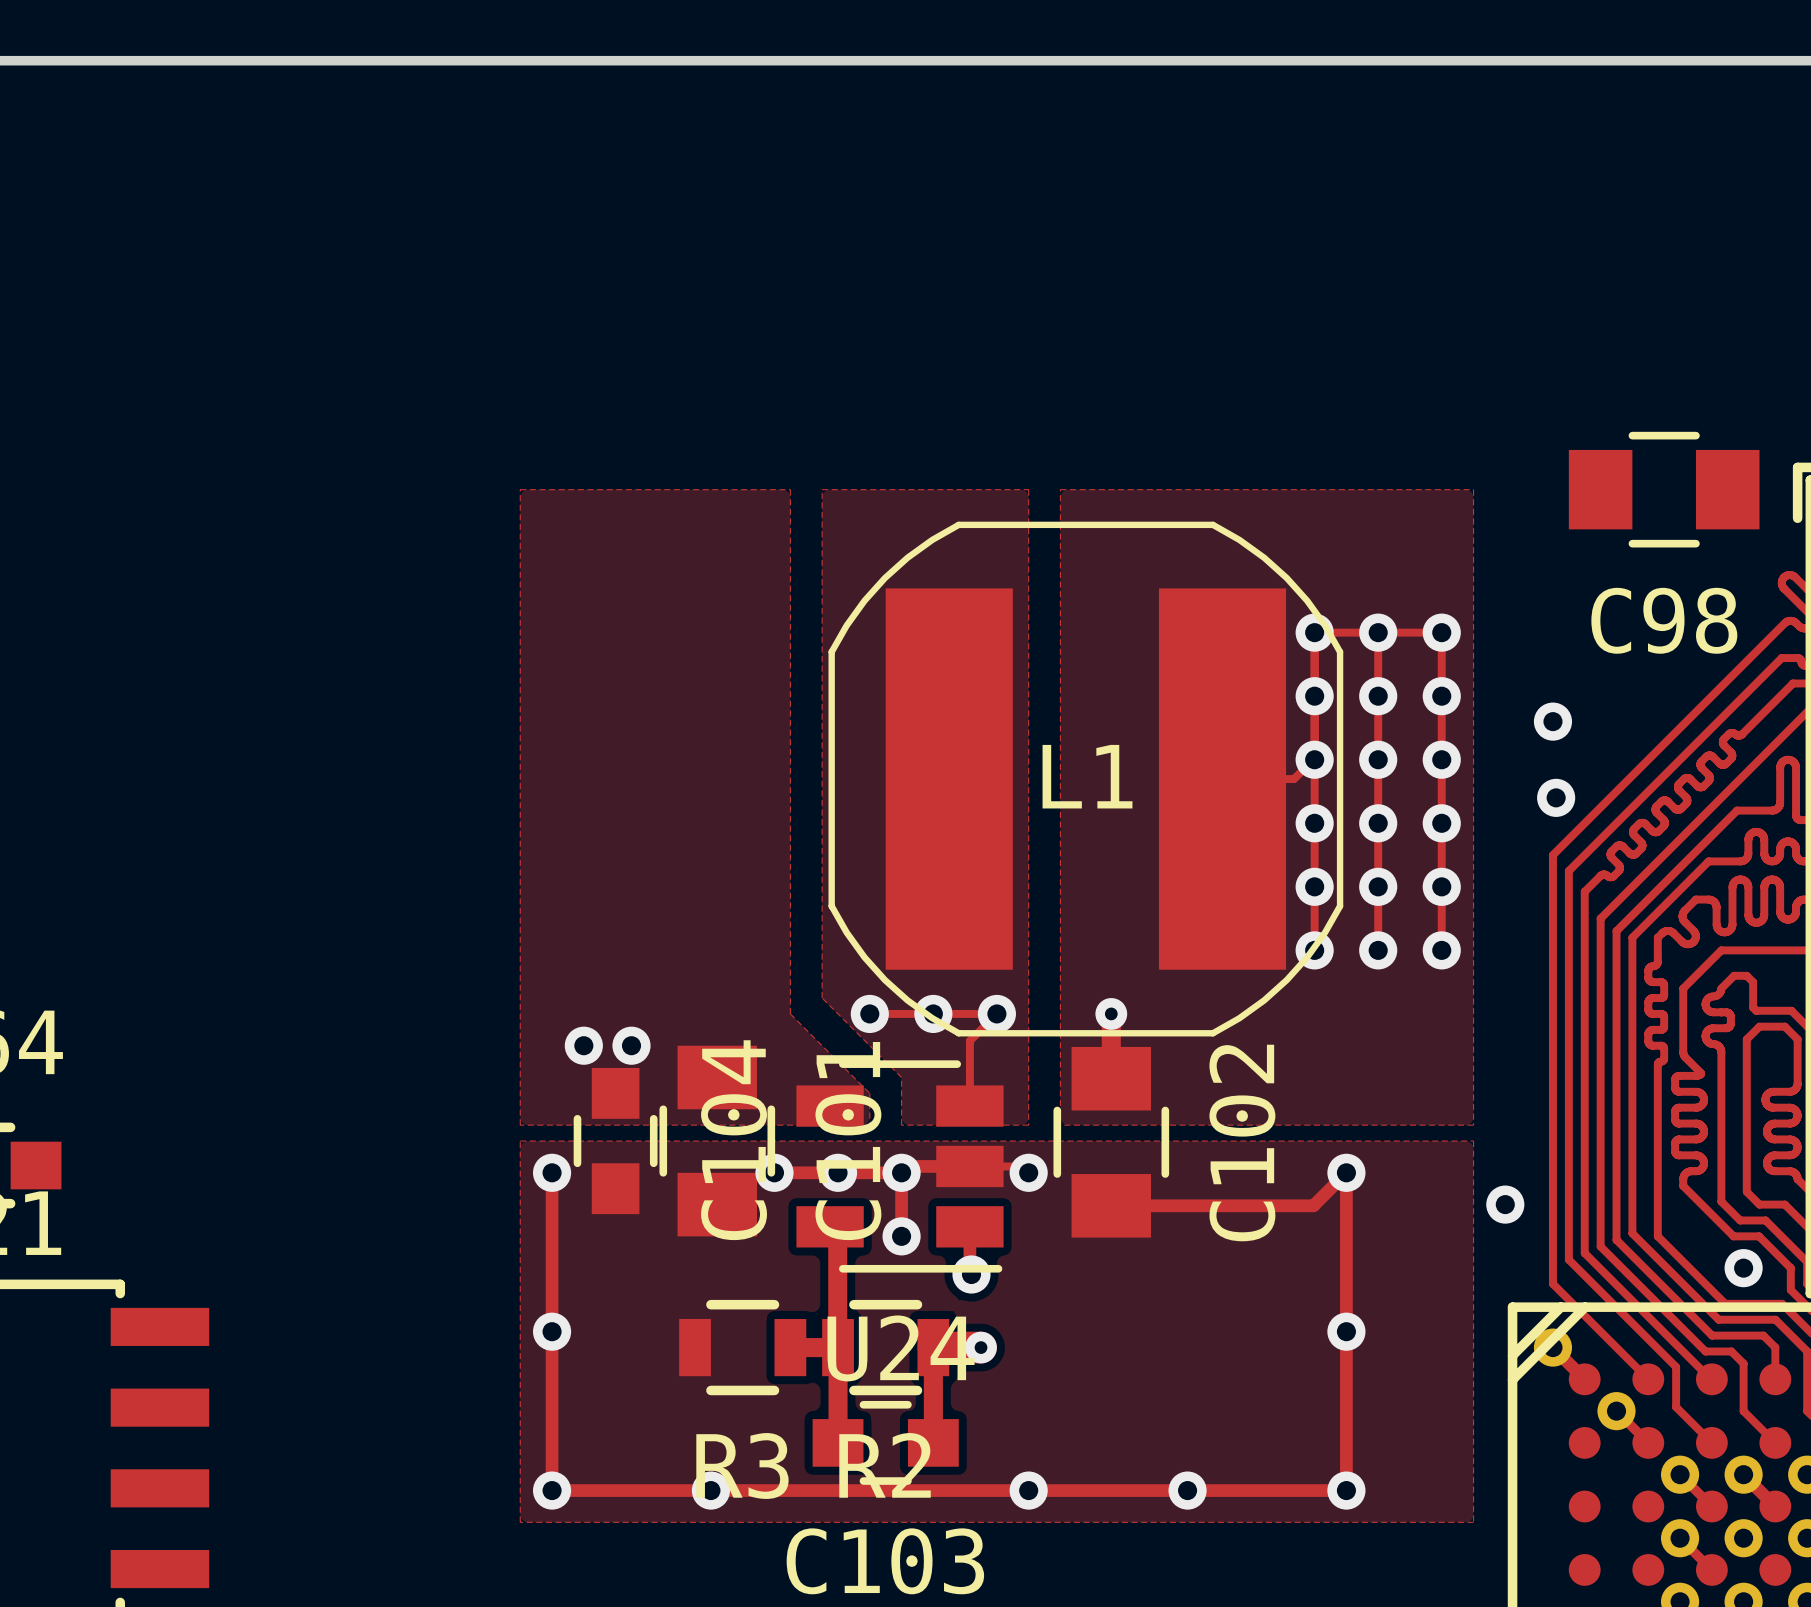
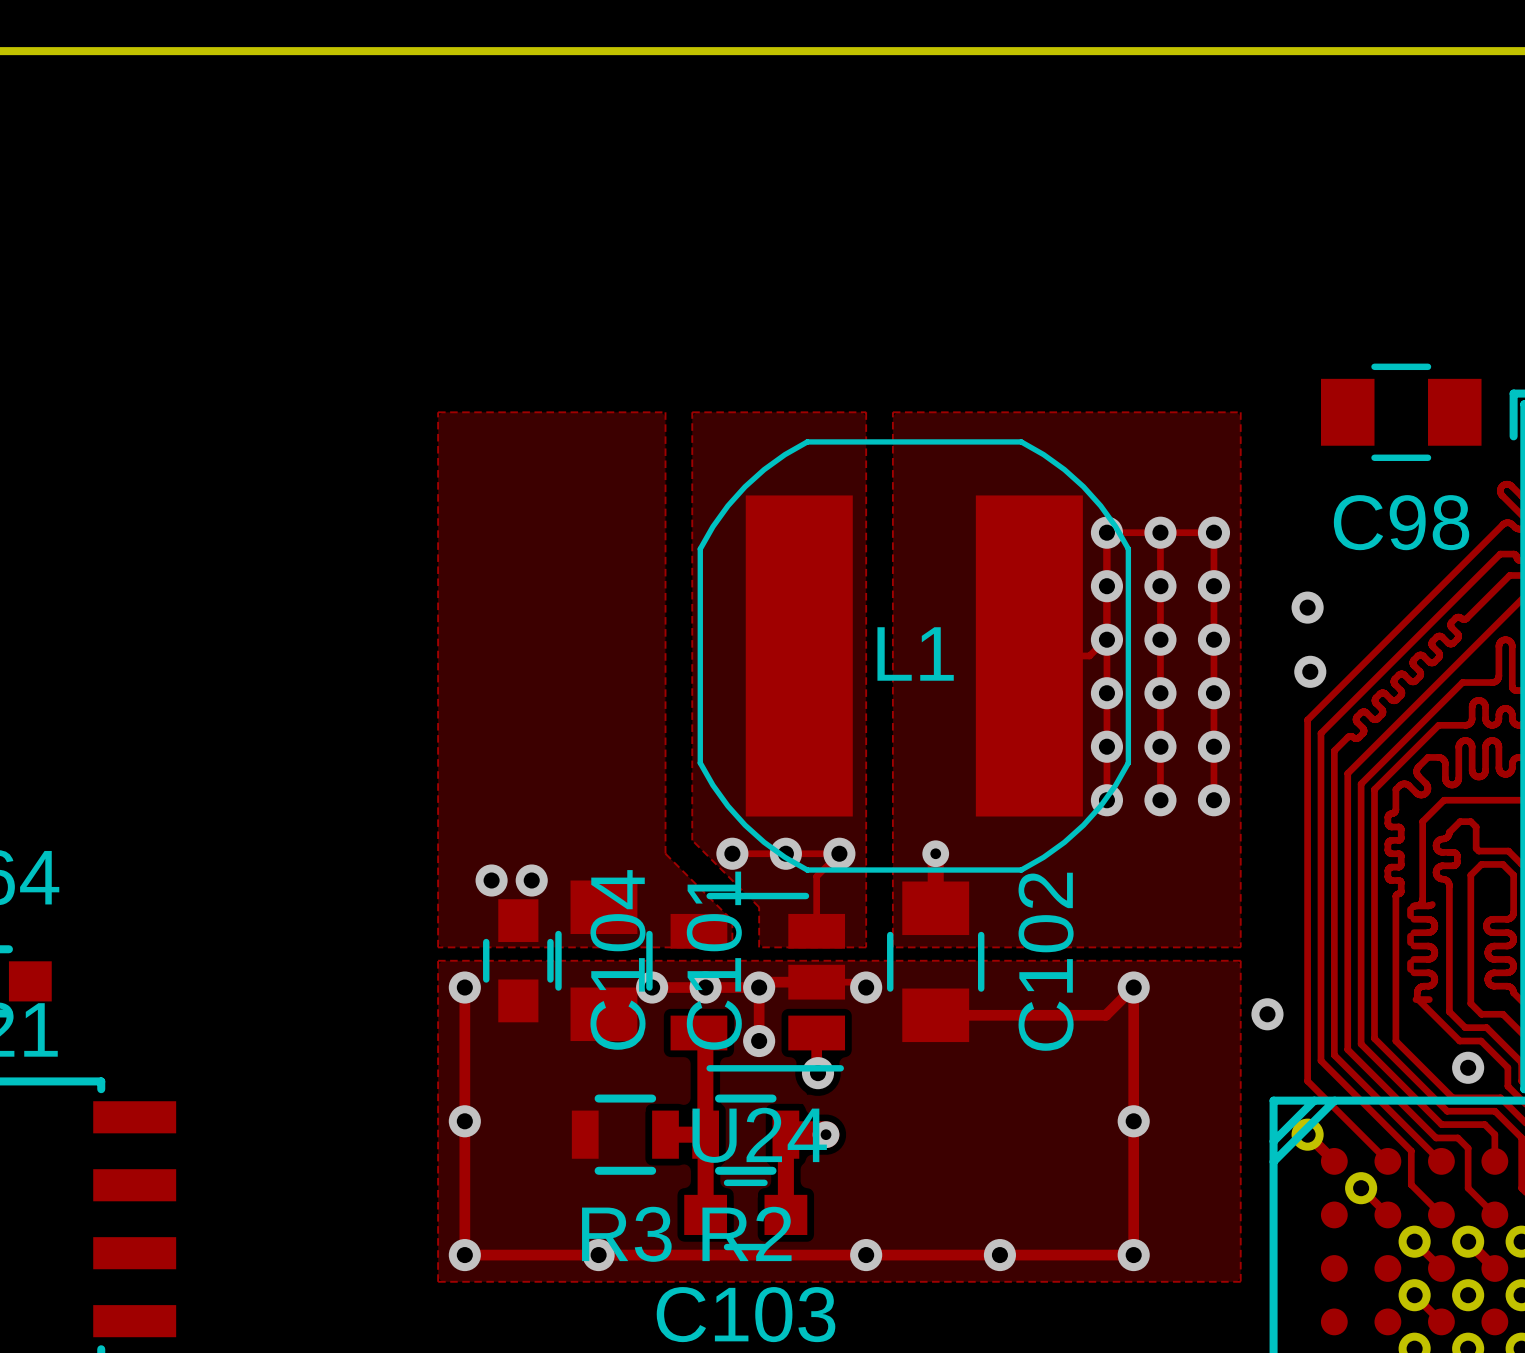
track: (1721, 950) (1683, 988) (1683, 1053) (1701, 1073) -> (1449, 800) (1444, 800) (1422, 821) (1422, 900) (1418, 905) (1413, 906)
track: none -> (1415, 999) (1429, 999)

